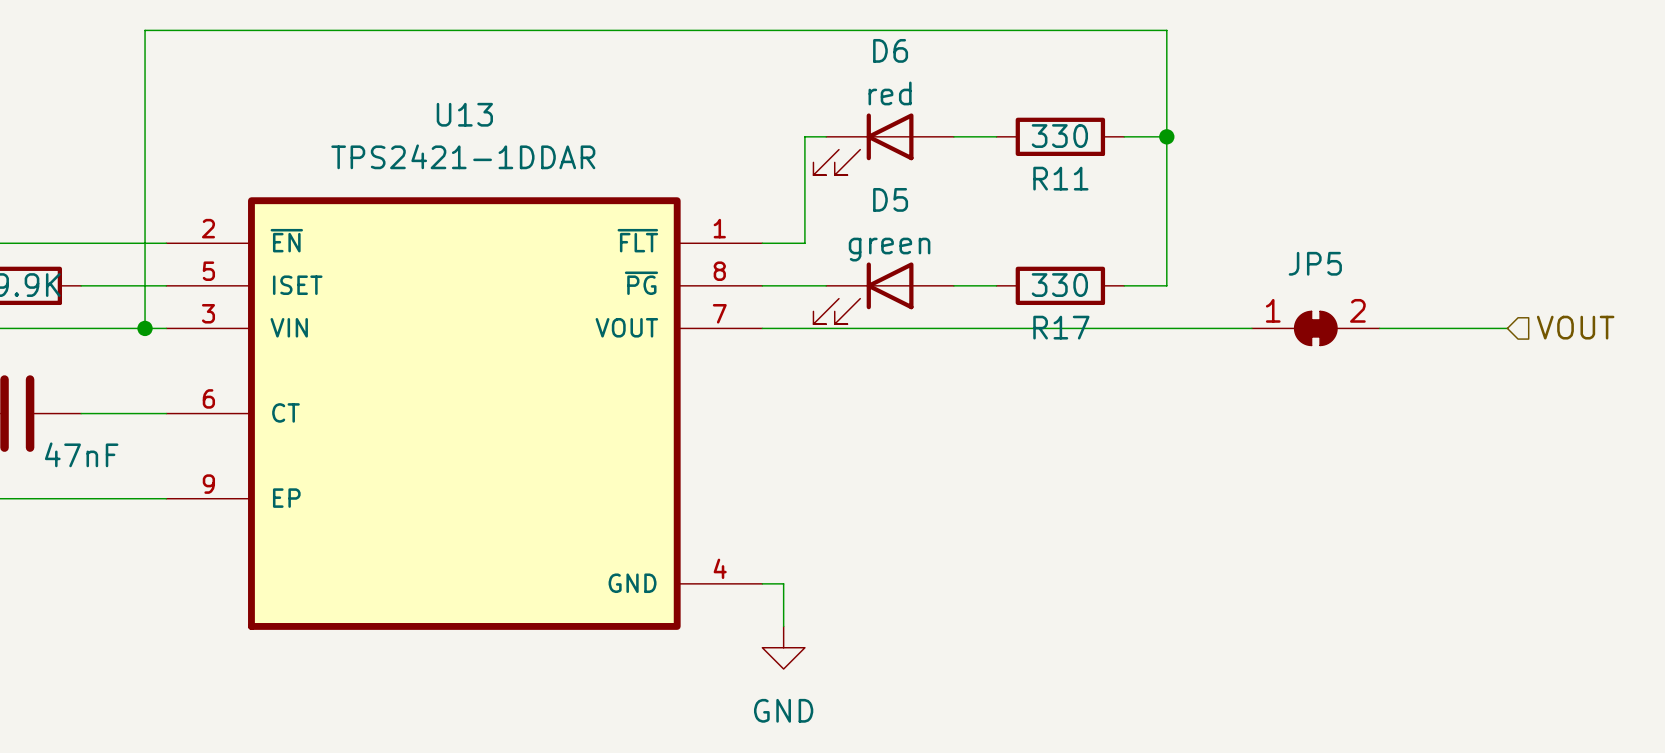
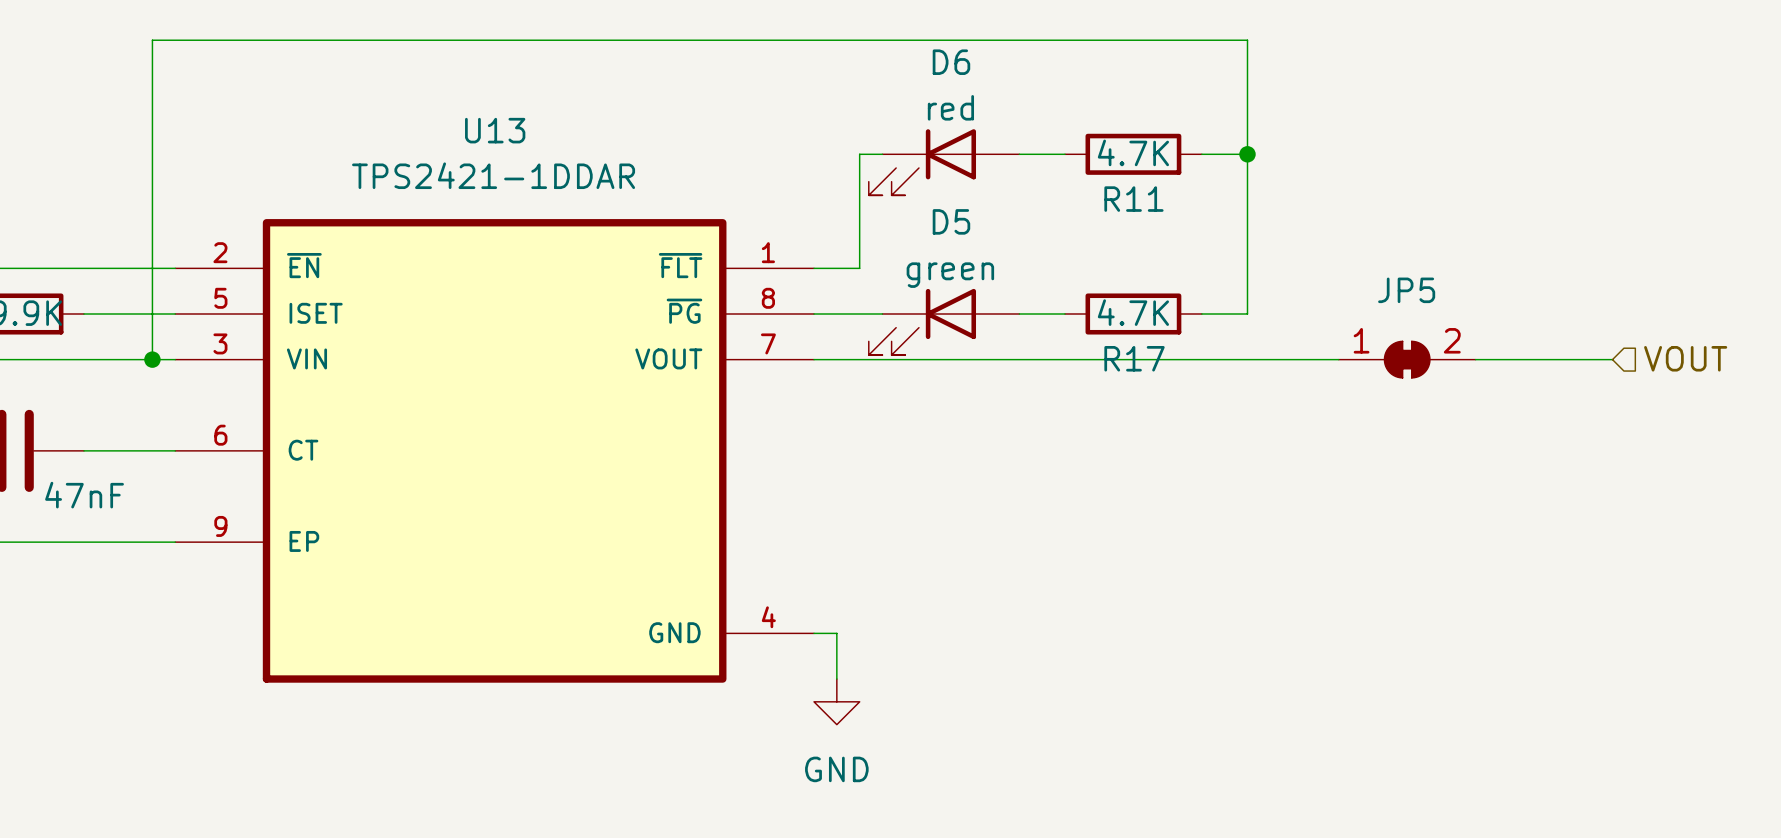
R11 value: 330 (1059, 136) -> 4.7K (1133, 152)
R17 value: 330 (1059, 285) -> 4.7K (1133, 312)

